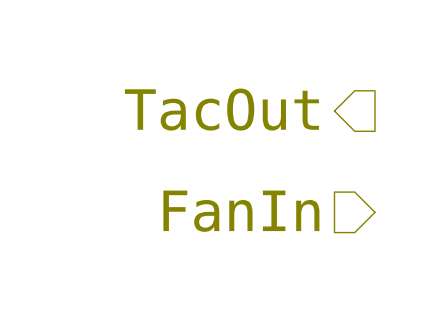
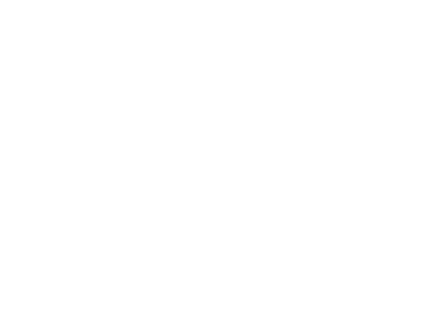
hierarchical label: TacOut (221, 109) -> none
hierarchical label: FanIn (241, 211) -> none

